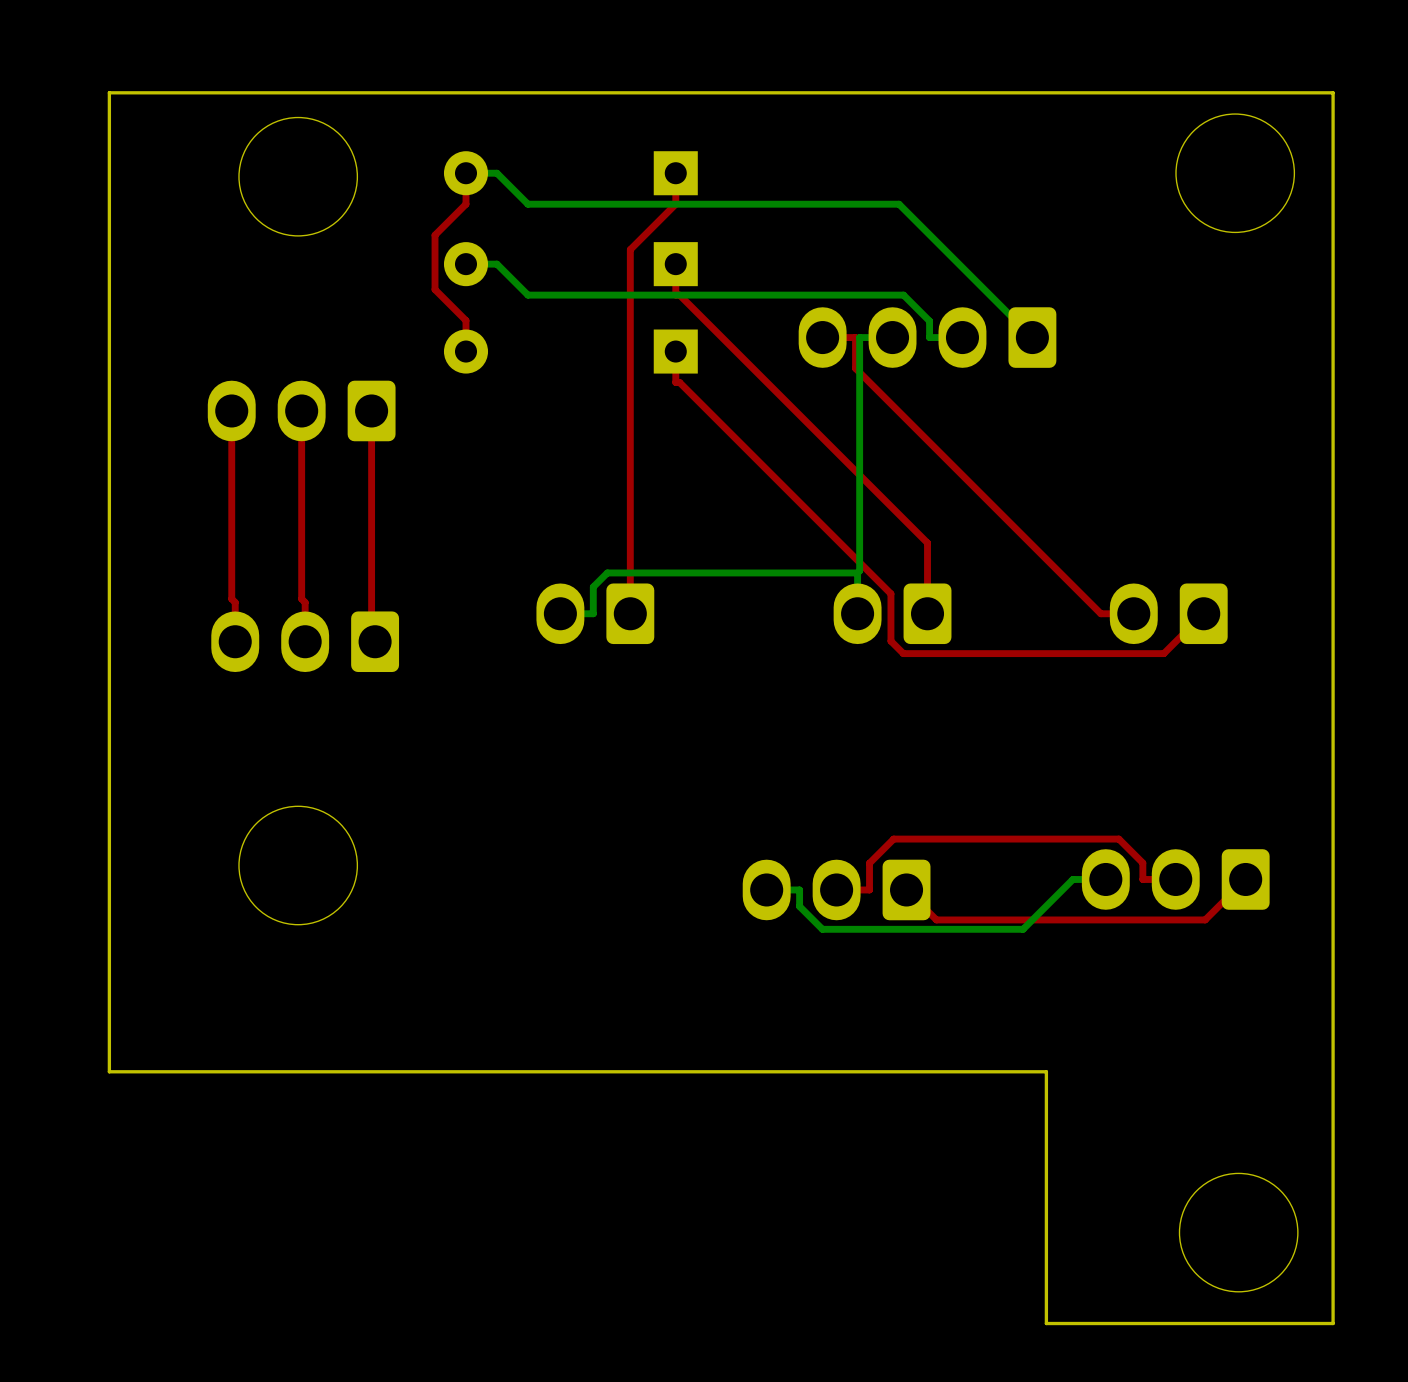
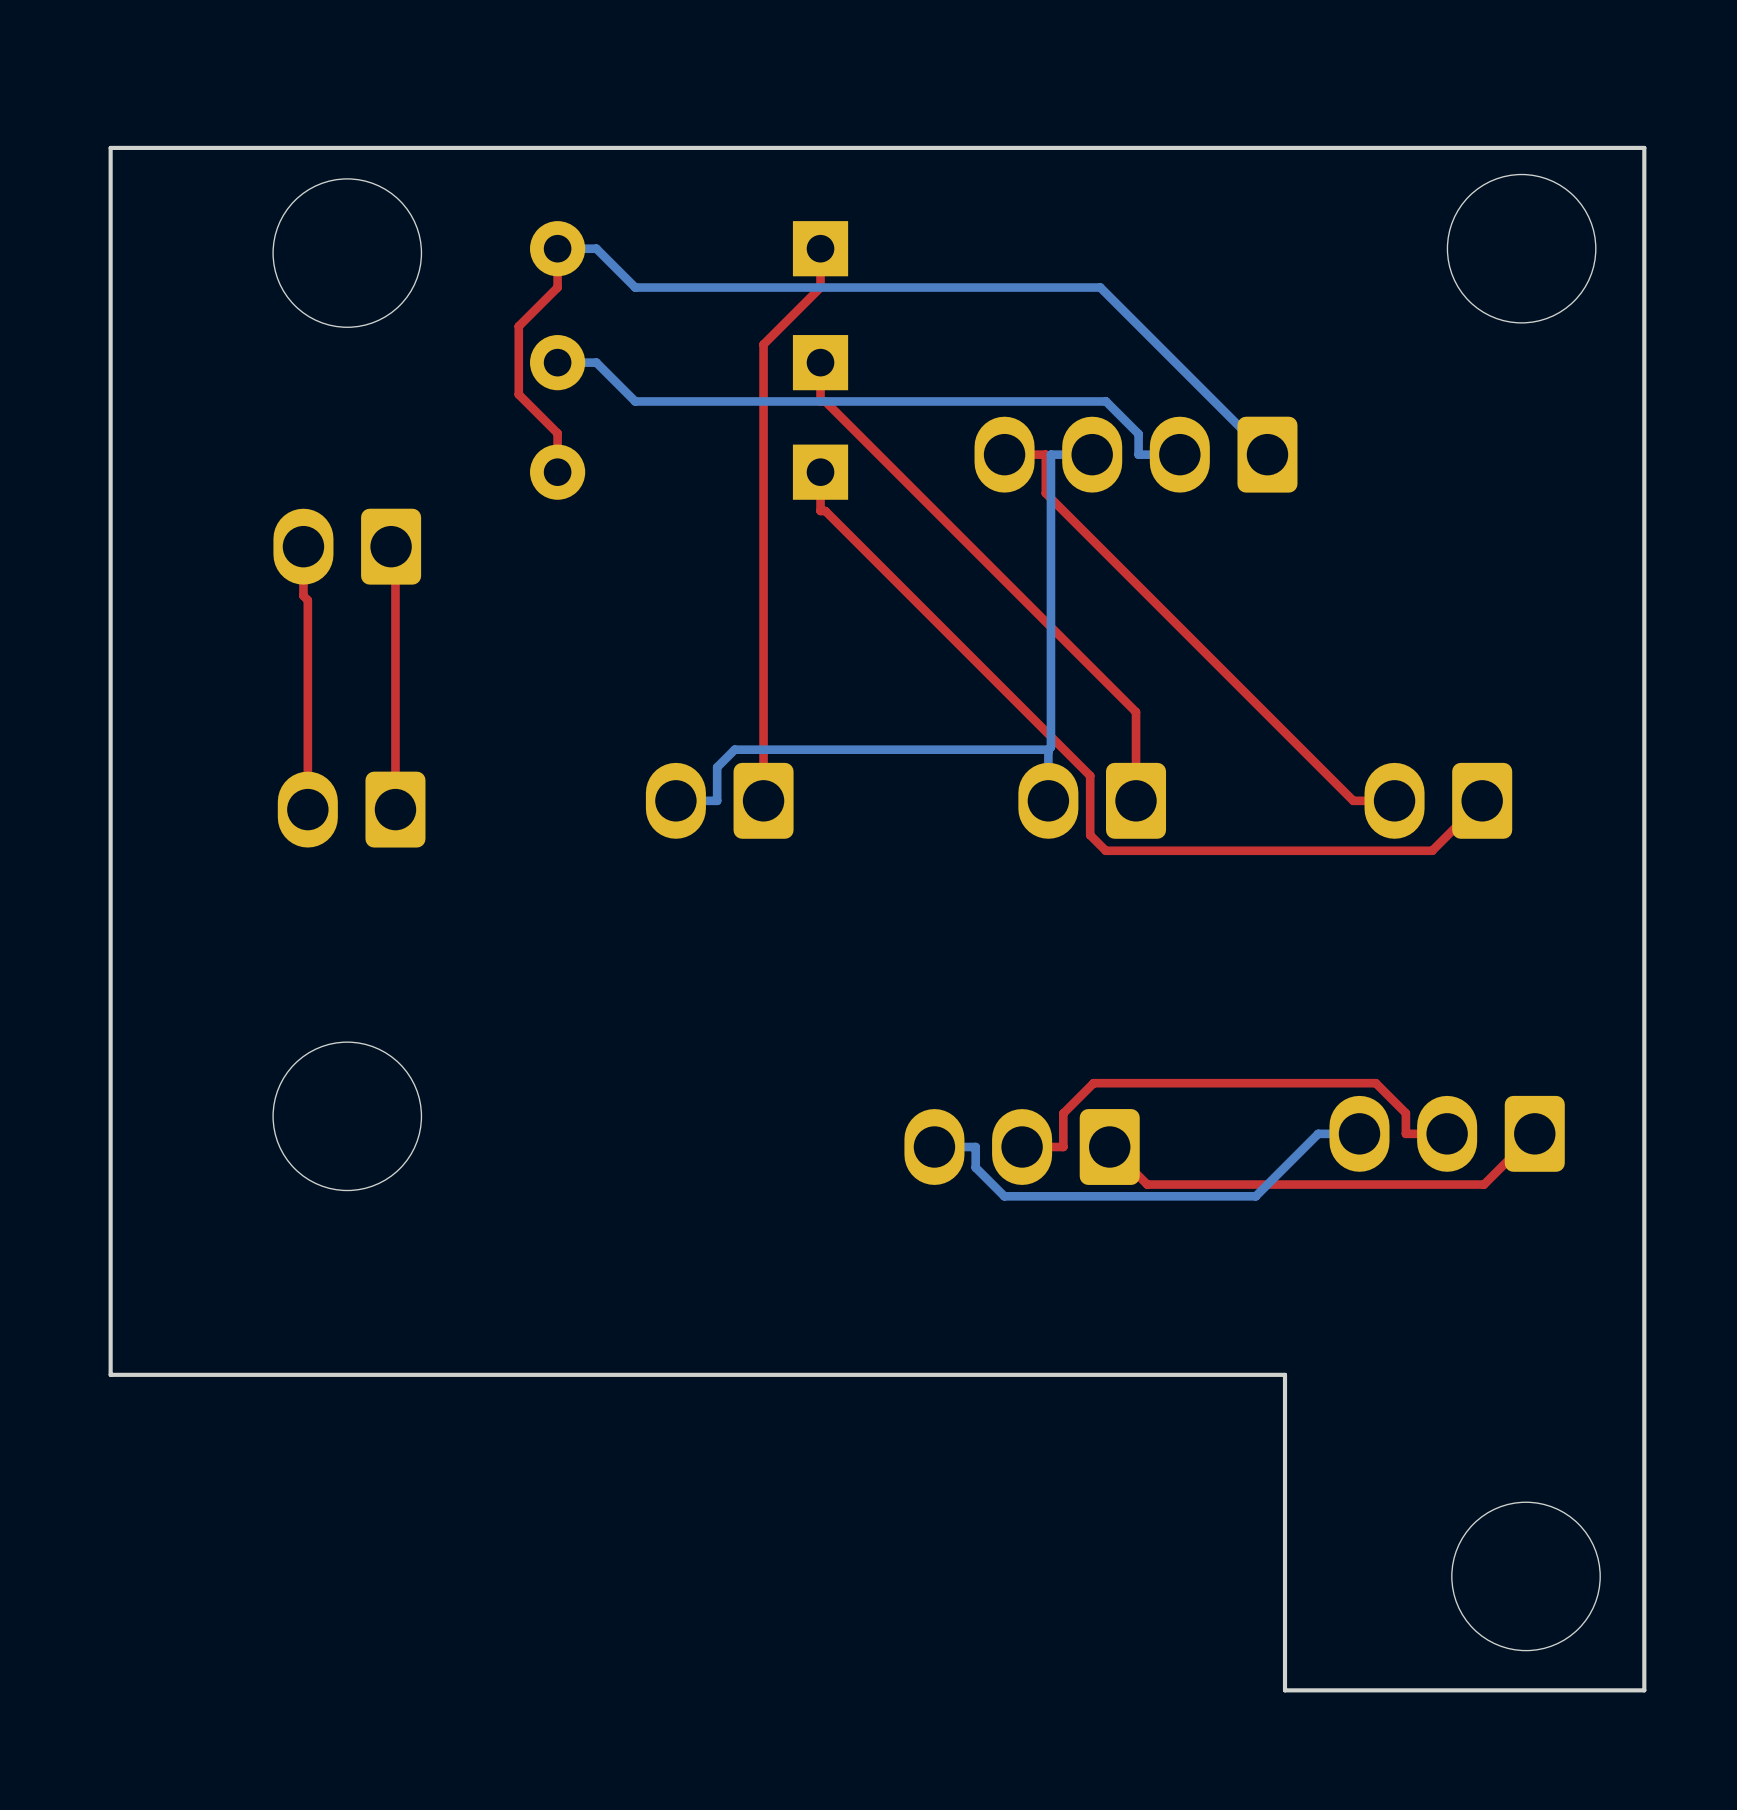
part footprint: [207, 380, 396, 442] -> [273, 508, 422, 585]
top track: (231, 410) (231, 599) (235, 602) (235, 641) -> none
top track: none -> (303, 546) (303, 595) (307, 600) (307, 809)
top track: (301, 410) (301, 599) (305, 602) (305, 641) -> none
top track: none -> (391, 546) (395, 551) (395, 809)
top track: (371, 410) (371, 638) (375, 641) -> none
part footprint: [211, 611, 400, 673] -> [277, 771, 426, 848]

